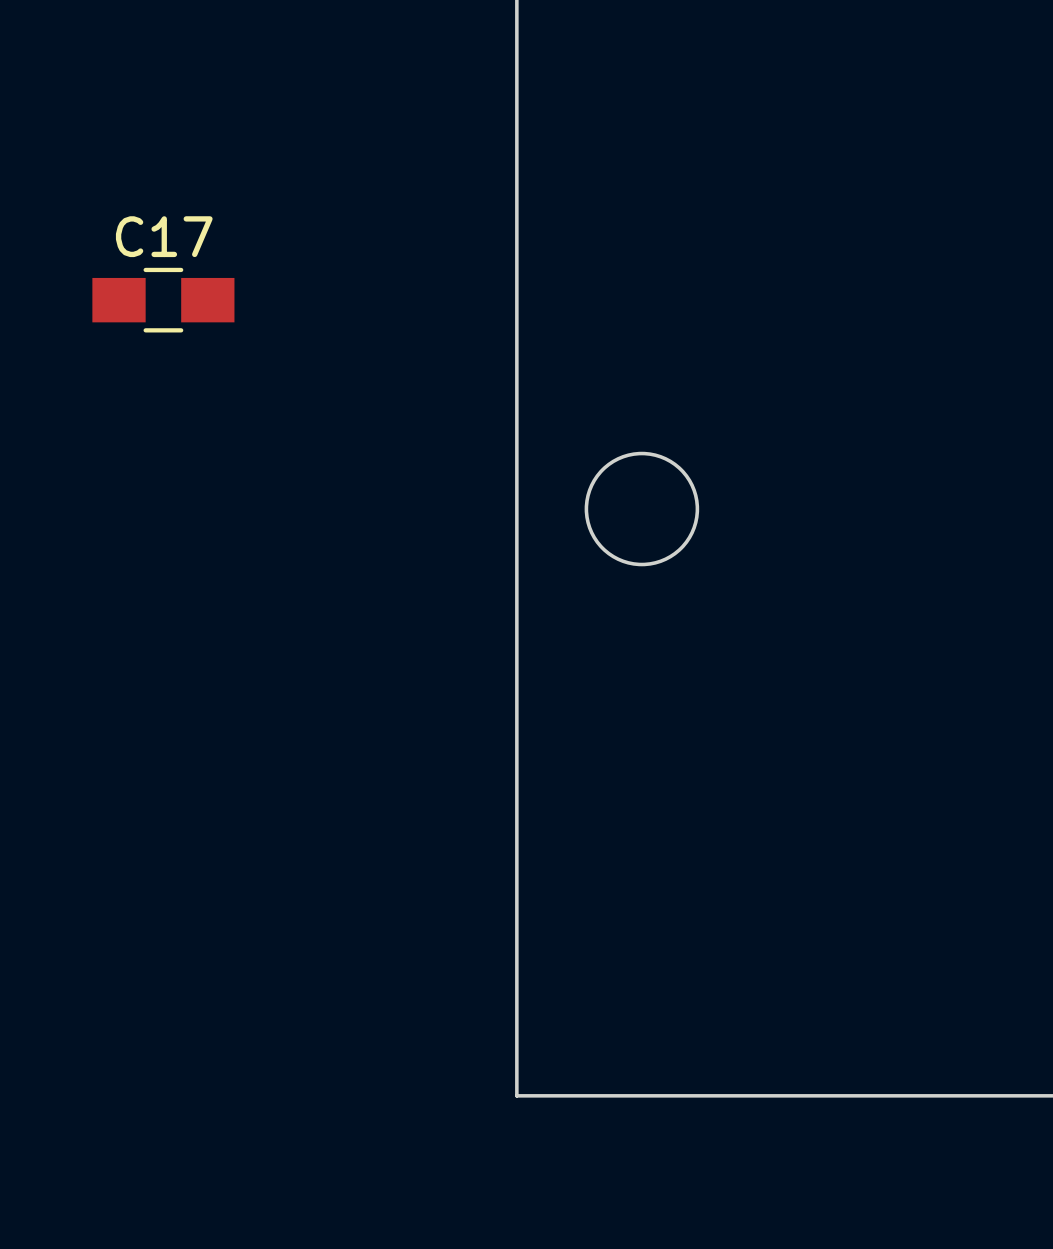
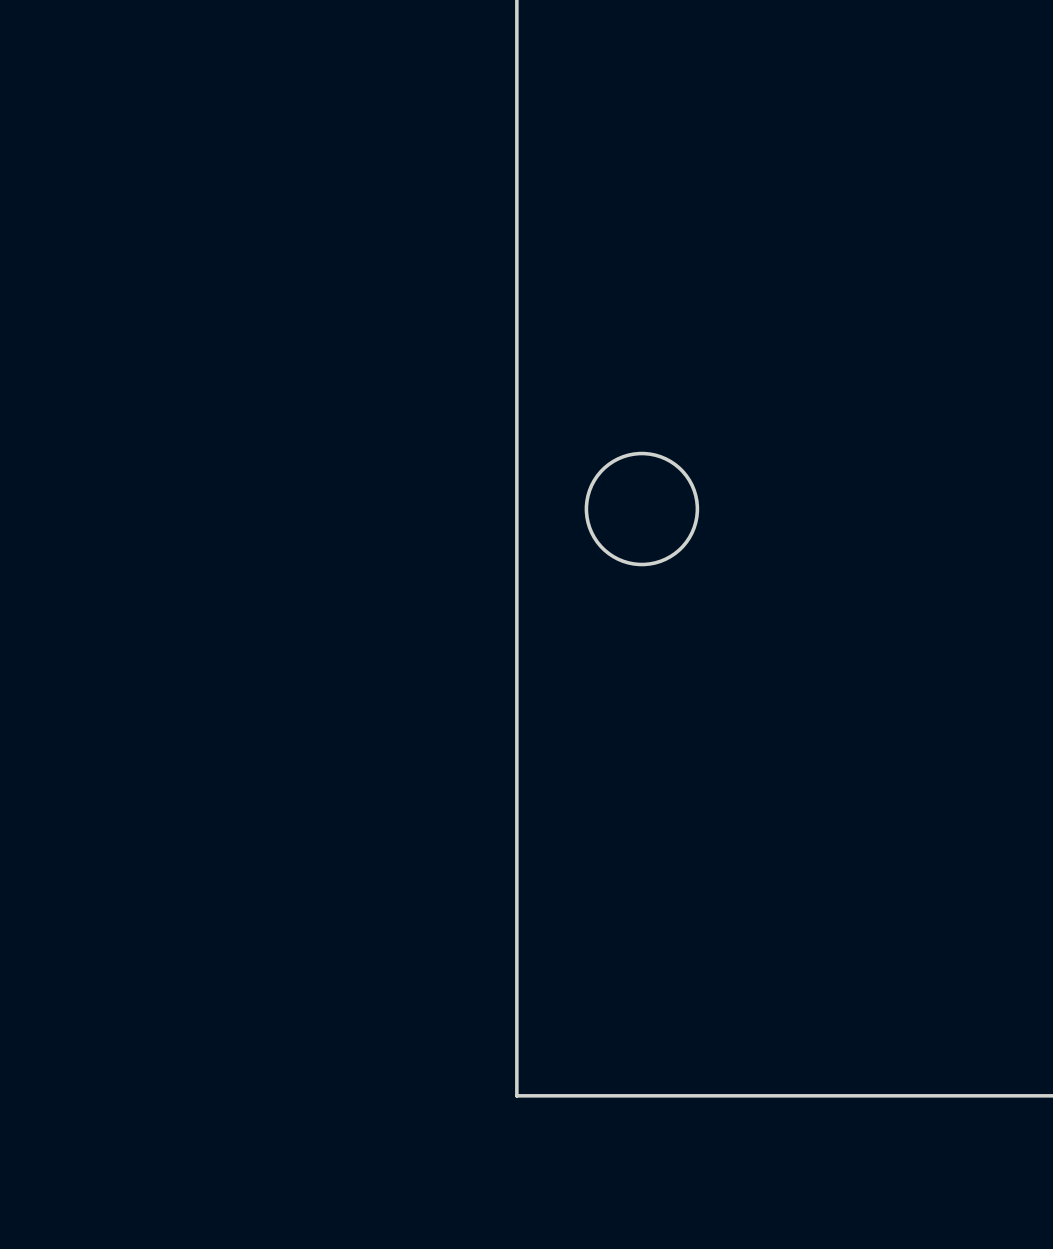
C17: (163, 300) -> none

